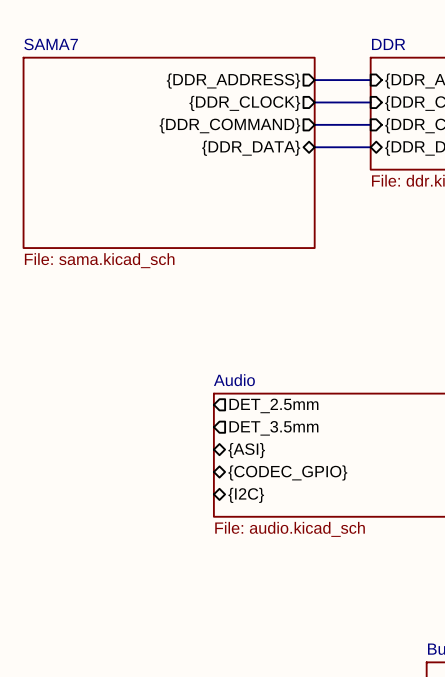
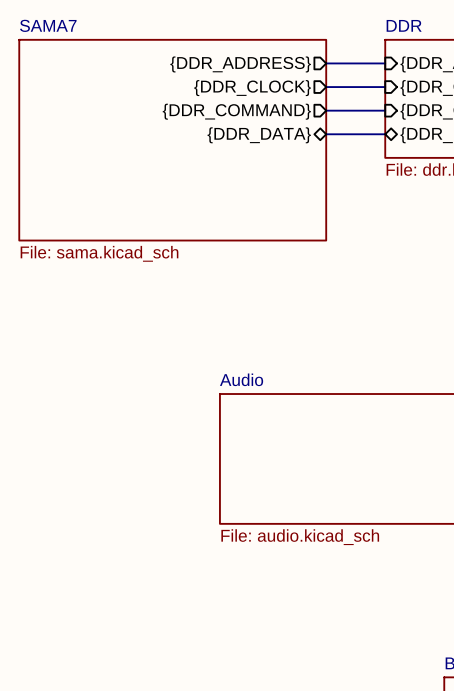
sheet pin: DET_2.5mm (273, 405) -> none
sheet pin: DET_3.5mm (273, 428) -> none
sheet pin: {ASI} (246, 450) -> none
sheet pin: {CODEC_GPIO} (287, 472) -> none
sheet pin: {I2C} (246, 495) -> none

